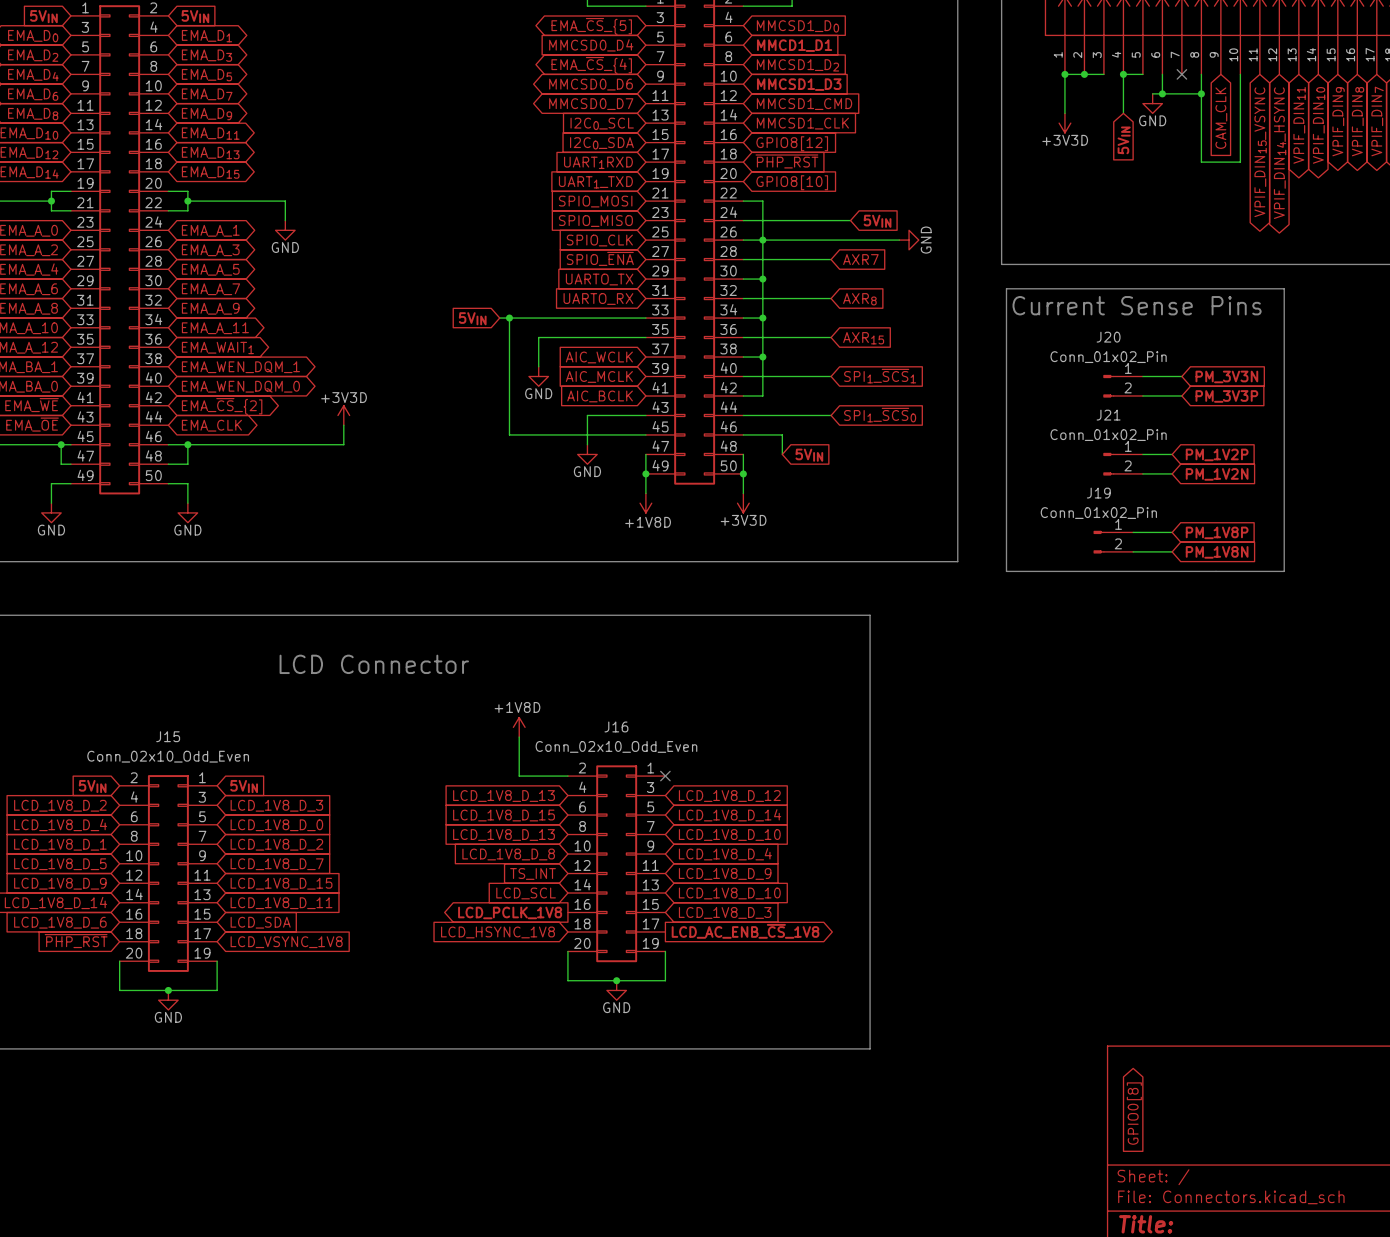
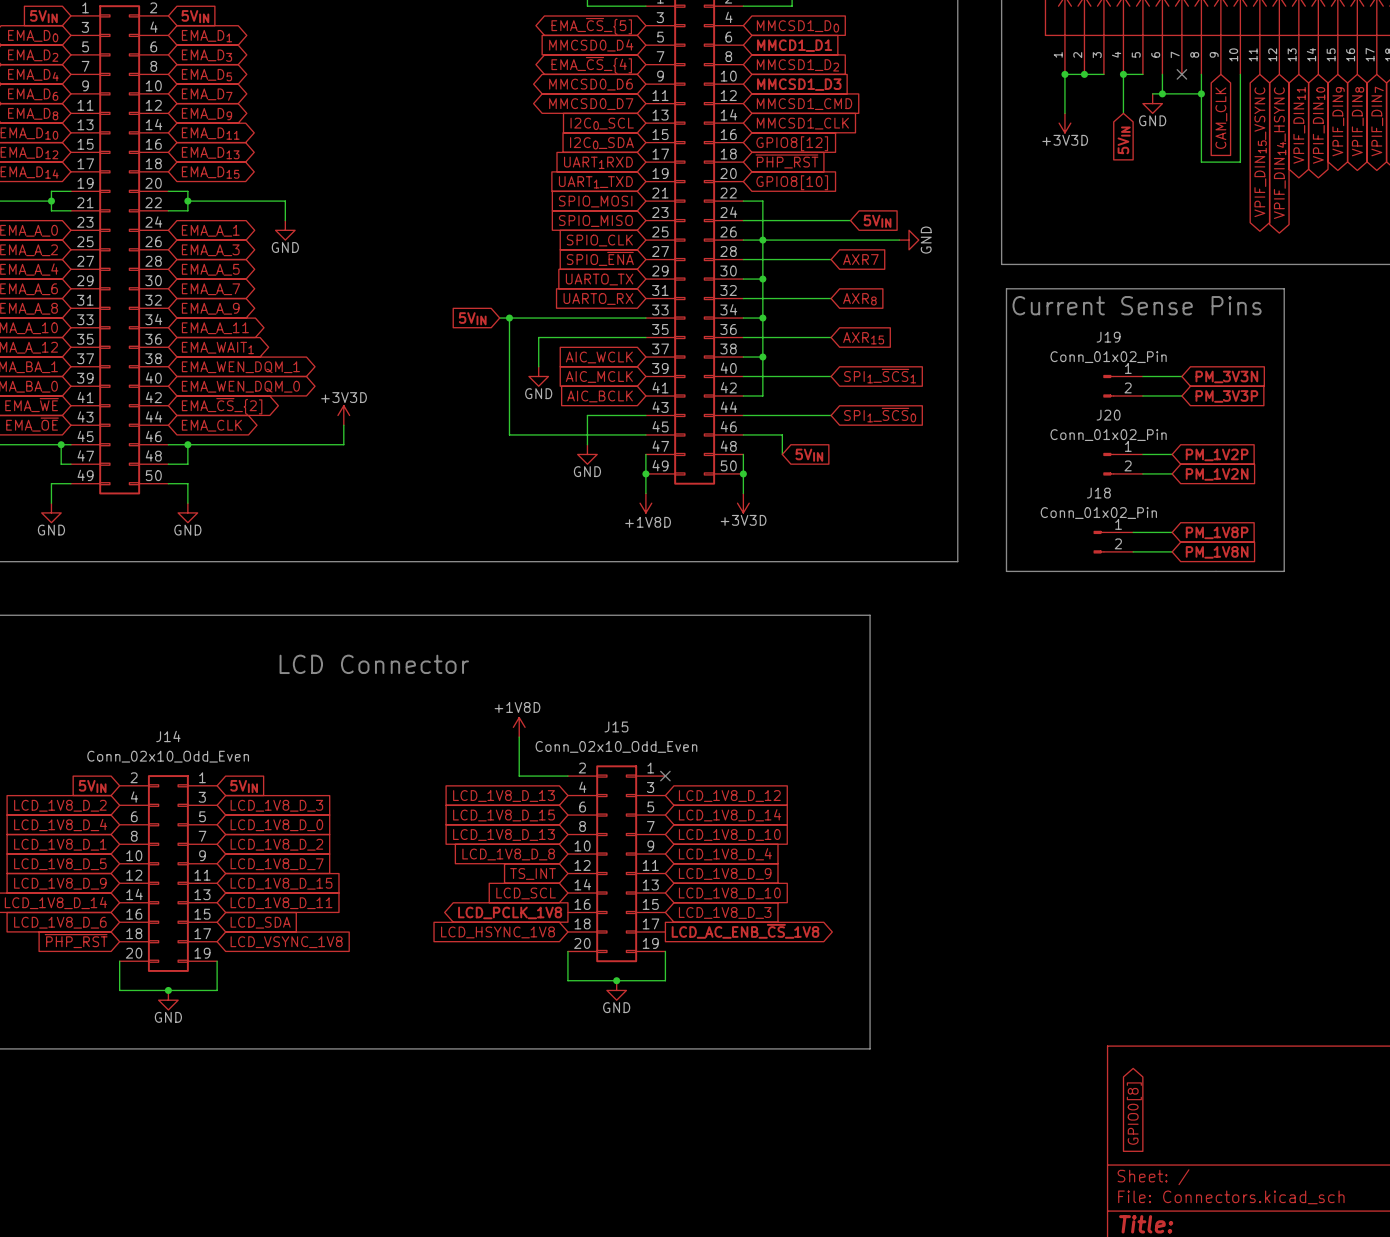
J20 name: J20 (1108, 337) -> J19 (1108, 337)
J21 name: J21 (1108, 415) -> J20 (1108, 415)
J19 name: J19 (1098, 493) -> J18 (1098, 493)
J16 name: J16 (616, 726) -> J15 (616, 726)
J15 name: J15 (168, 736) -> J14 (168, 736)

